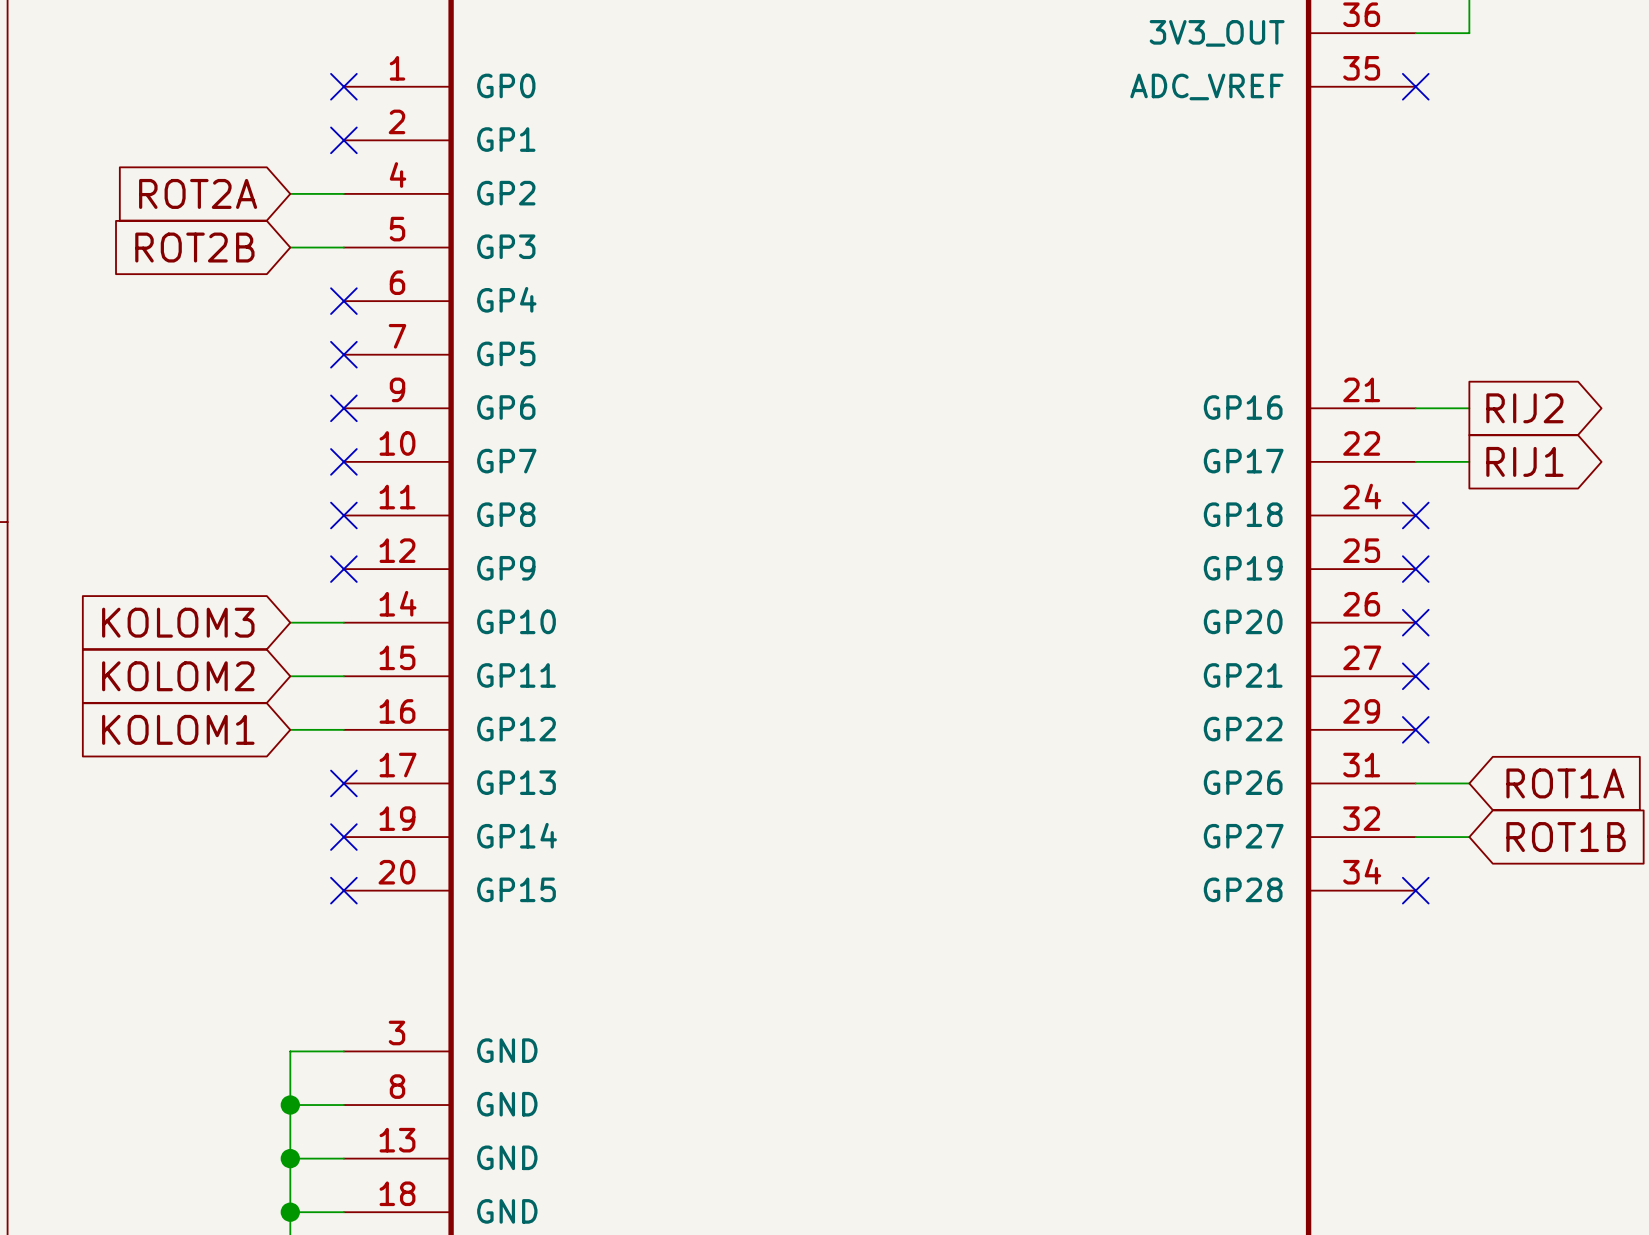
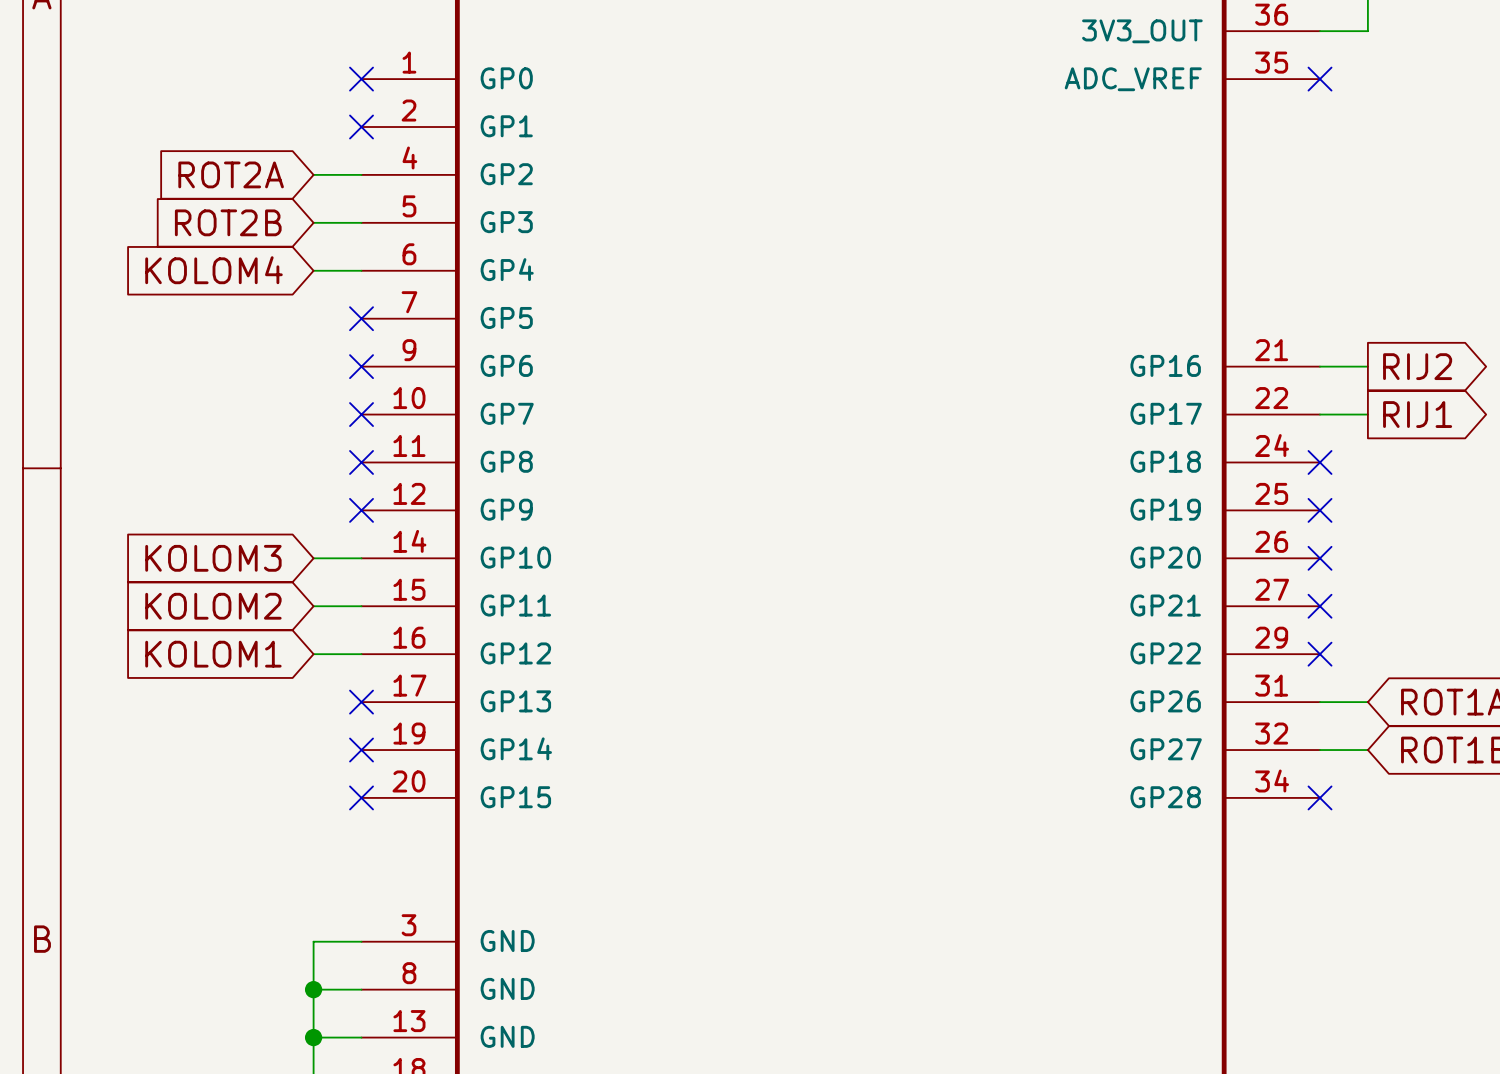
global label: none -> KOLOM4 (214, 270)
wire: none -> (313, 270) (361, 270)
no-connect mark: (343, 301) -> none

